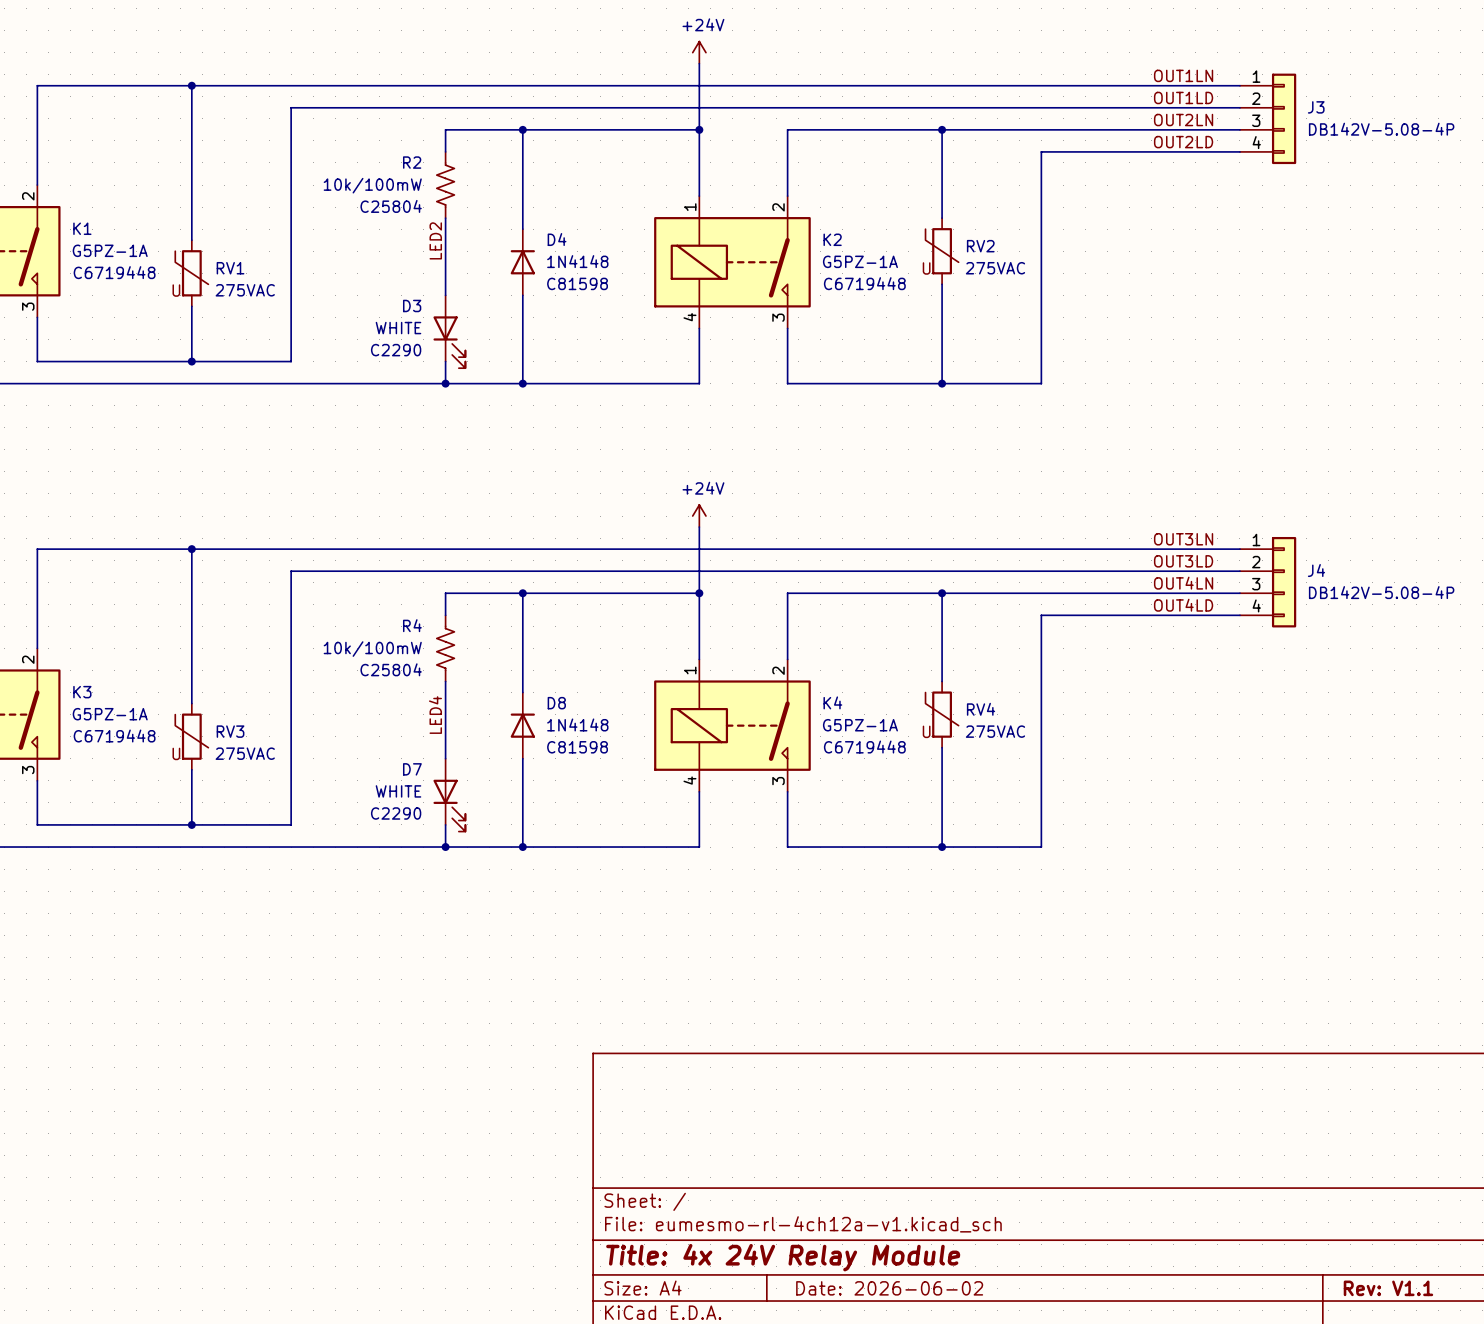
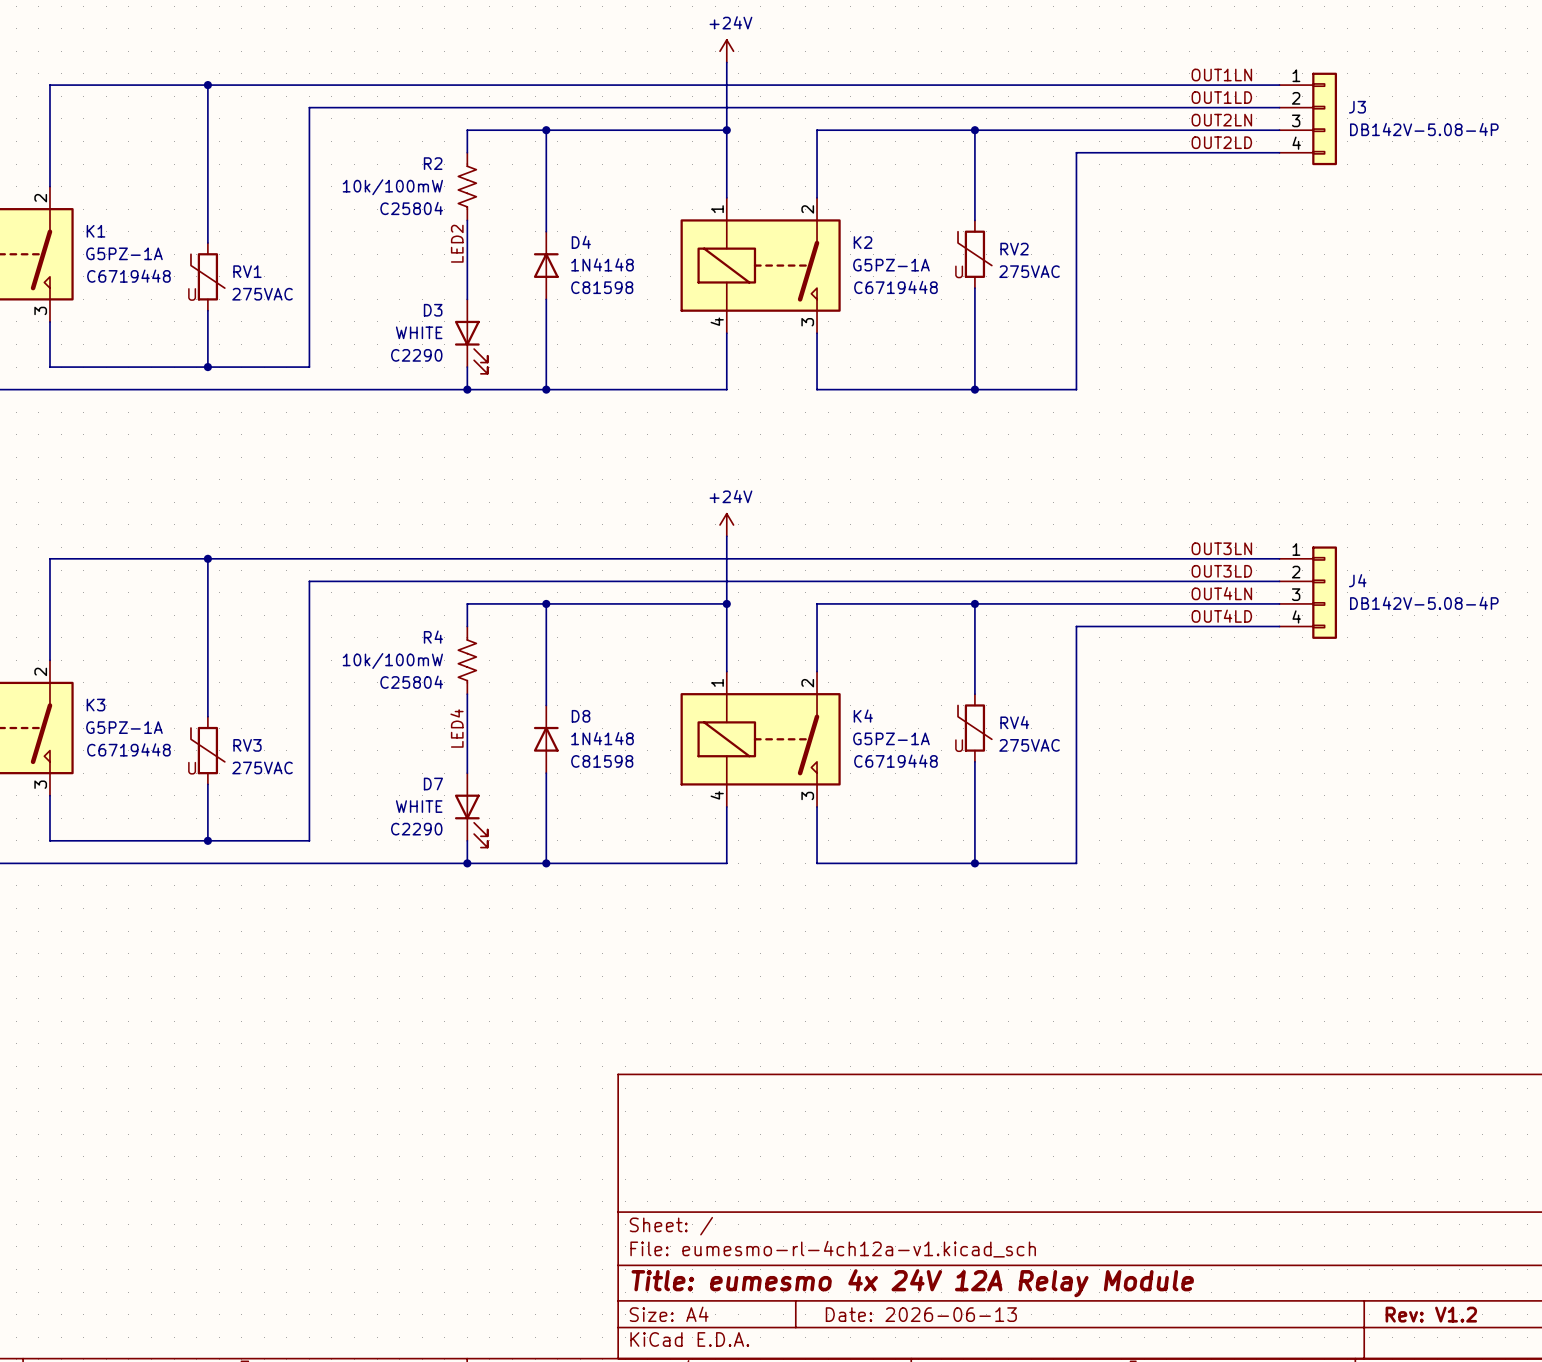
title block: Title: 4x 24V Relay Module (783, 1257) -> Title: eumesmo 4x 24V 12A Relay Module (912, 1283)
title block: Date: 2026-06-02 (889, 1288) -> Date: 2026-06-13 (921, 1314)
title block: Rev: V1.1 (1388, 1288) -> Rev: V1.2 (1431, 1314)

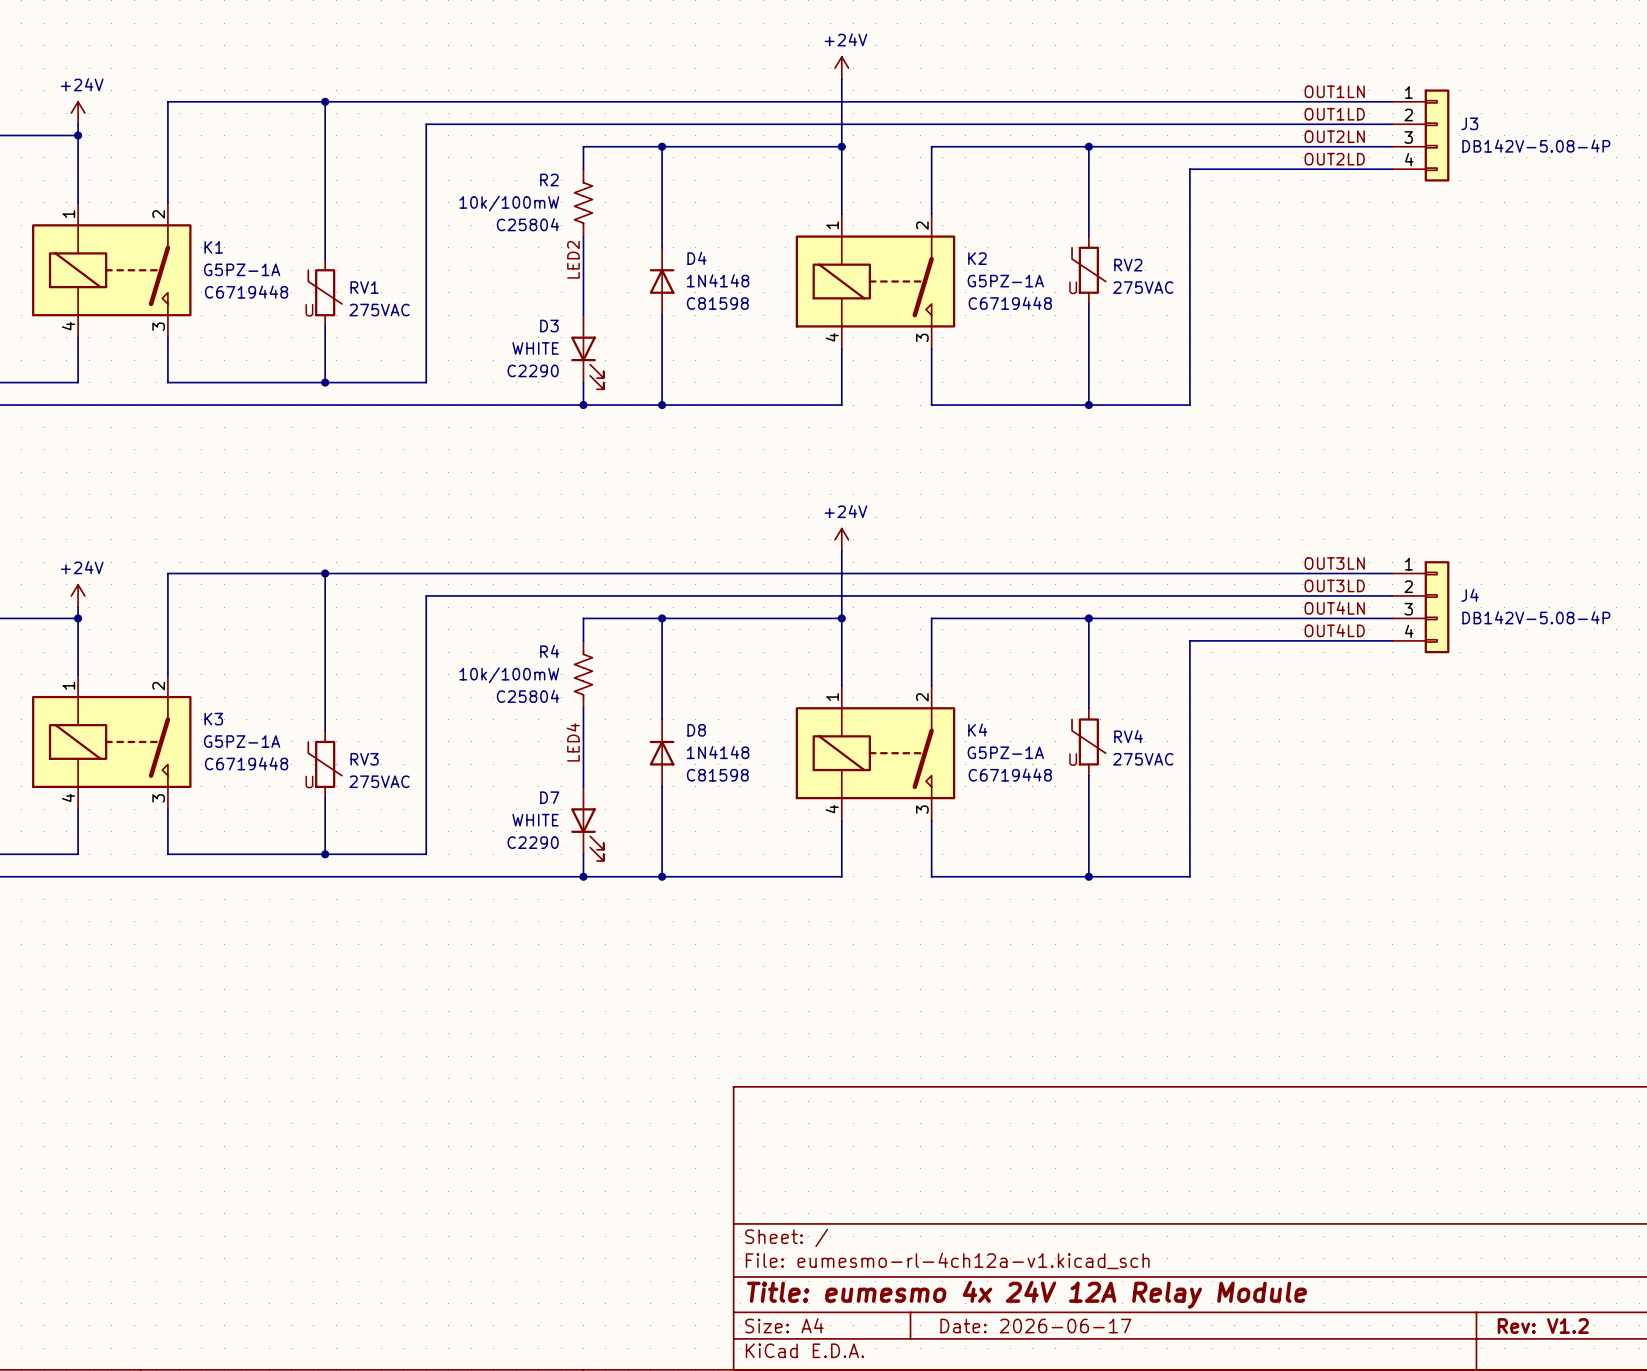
title block: Date: 2026-06-13 (921, 1314) -> Date: 2026-06-17 (1035, 1326)

